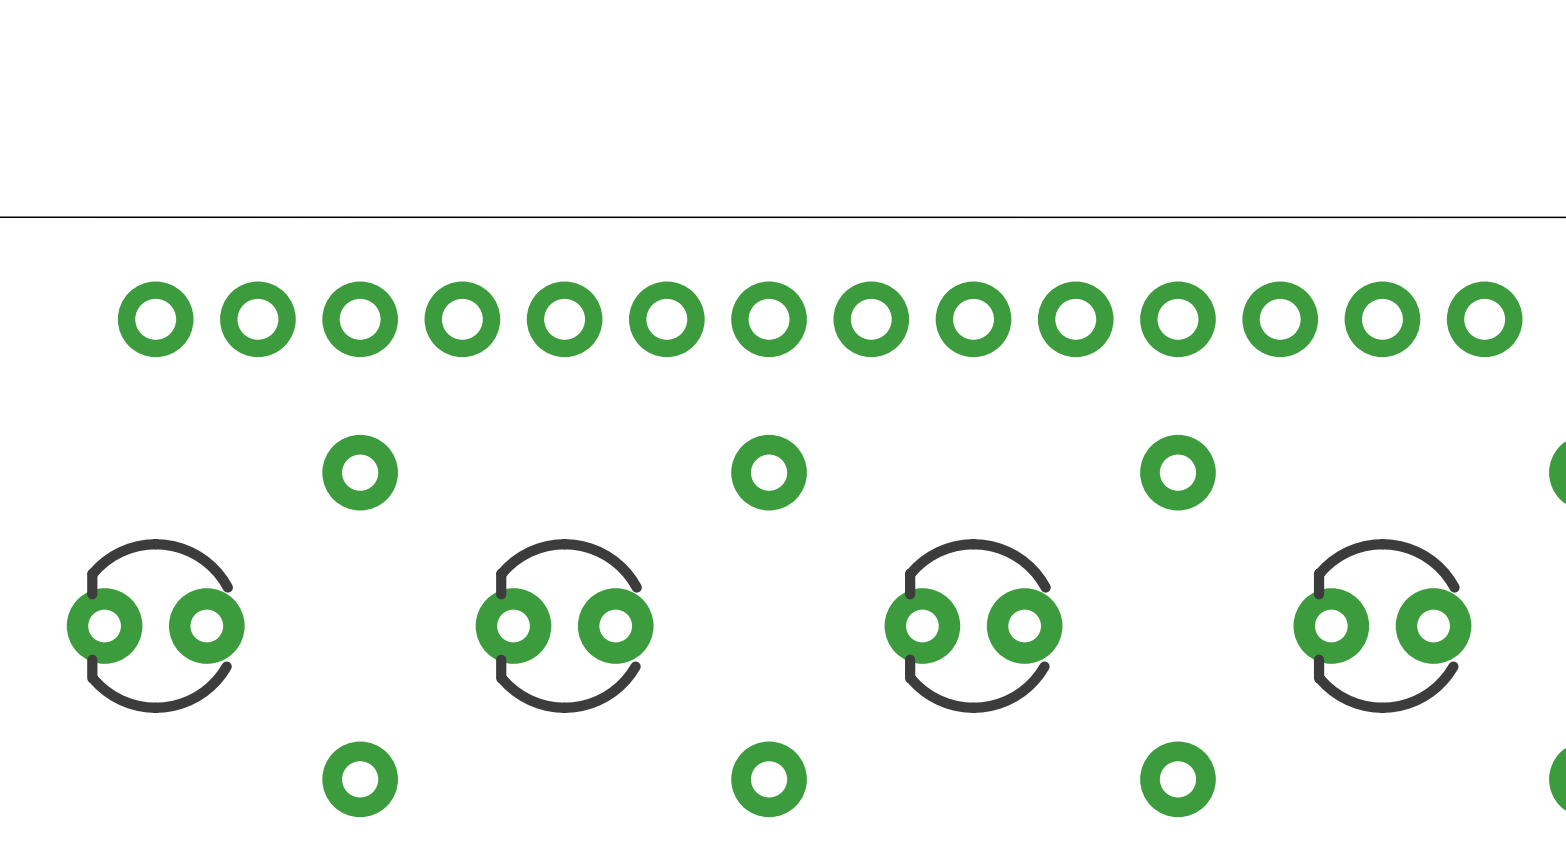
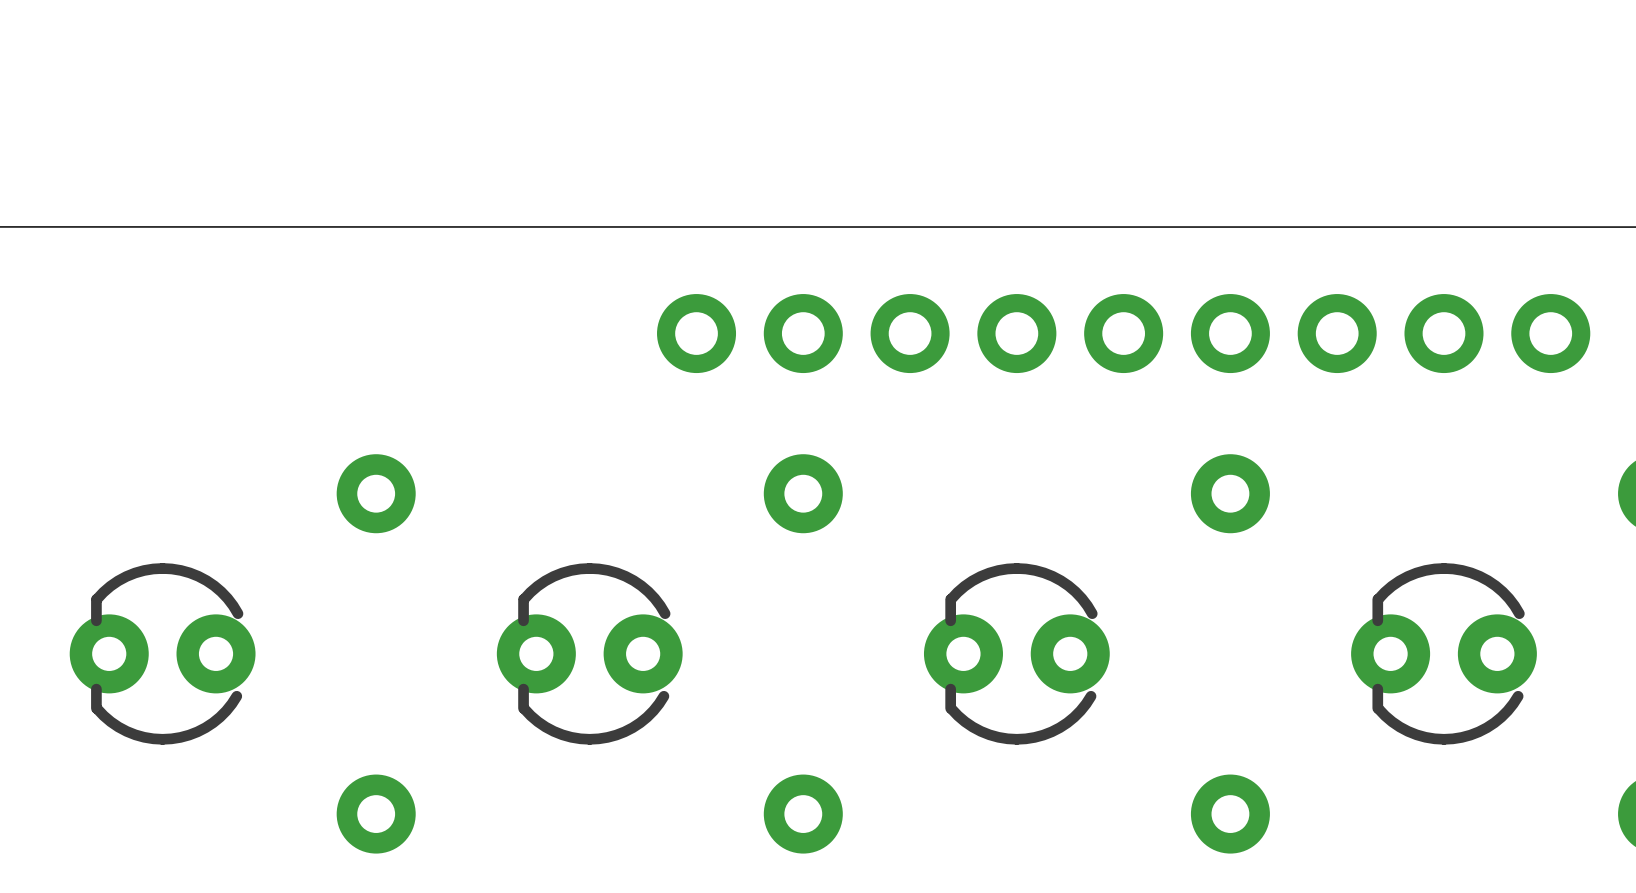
part: (820, 319) -> none

